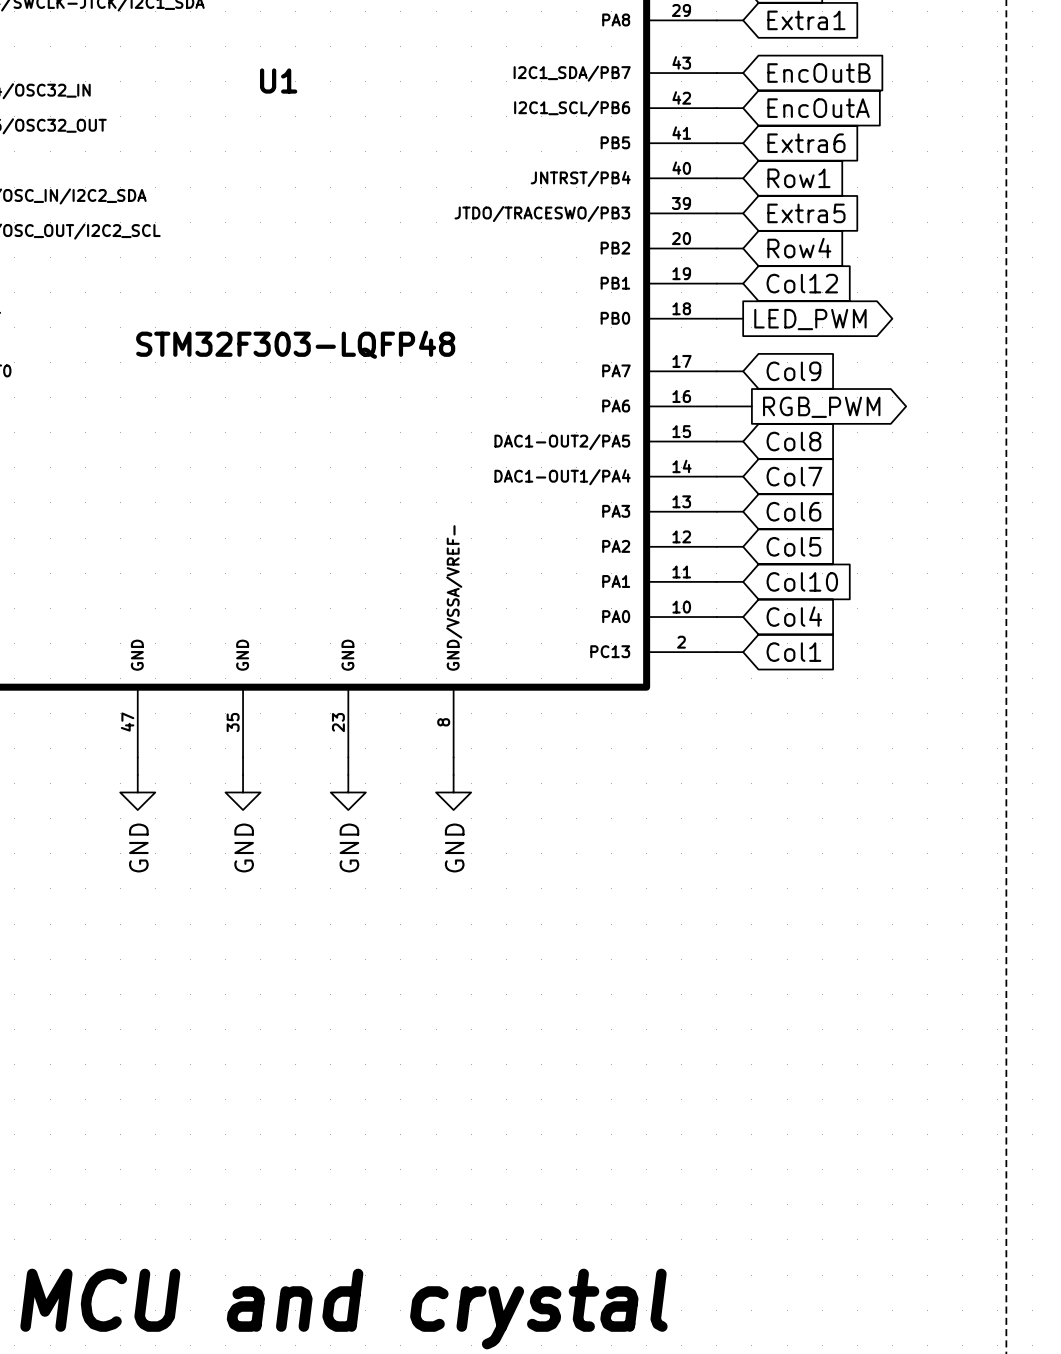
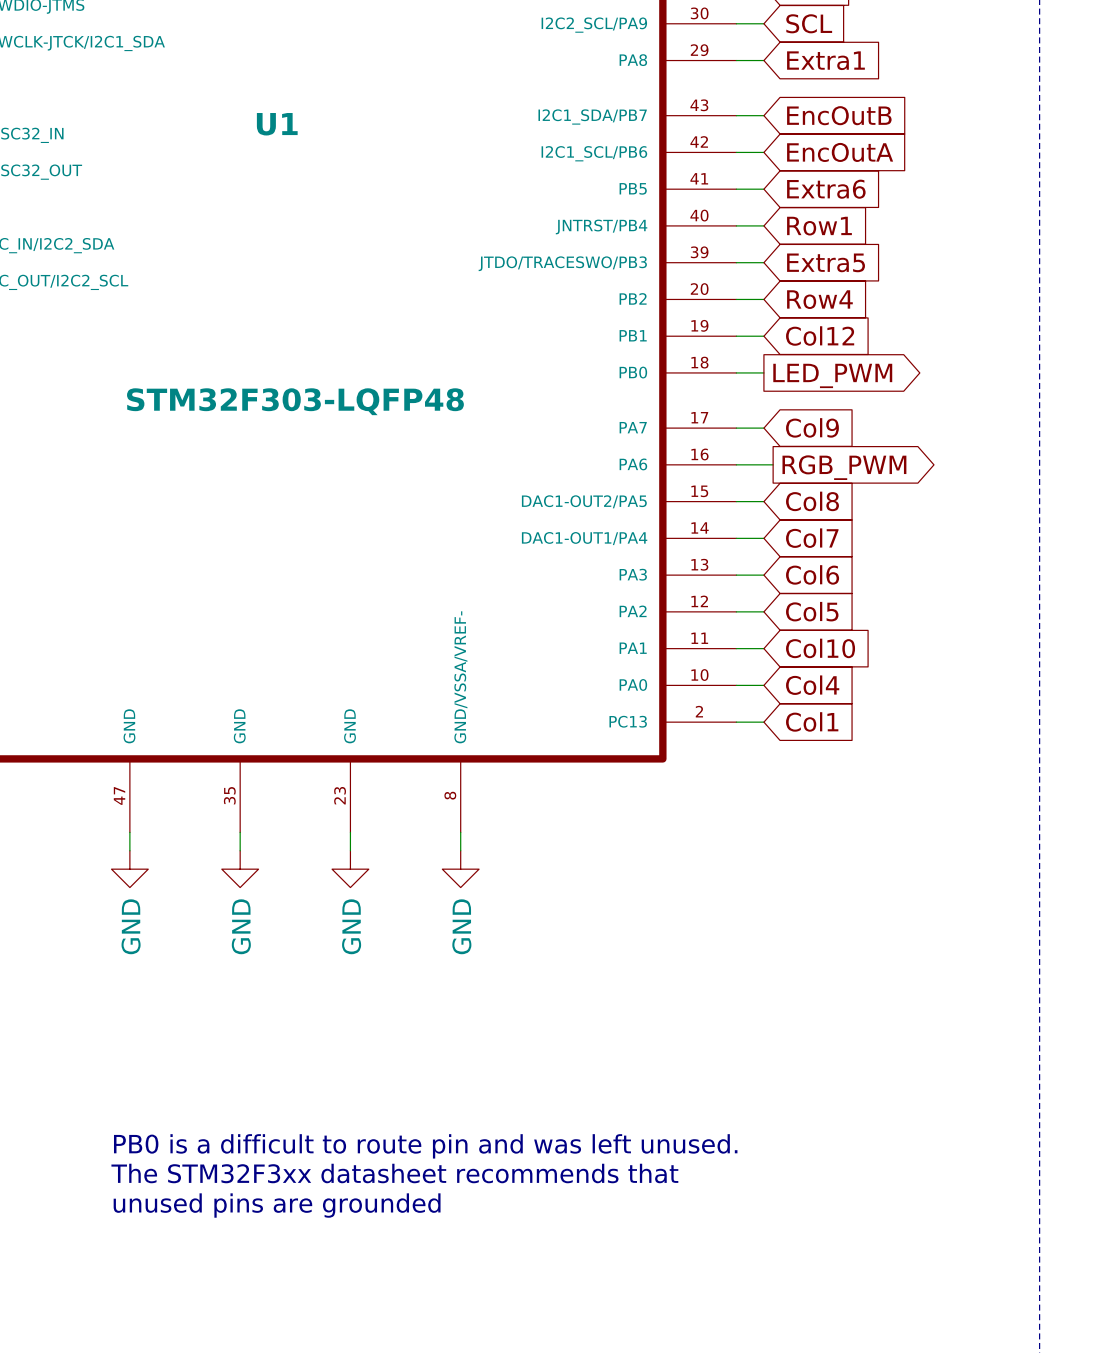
text: none -> PB0 is a difficult to route pin and was left unused. (425, 1146)
text: none -> The STM32F3xx datasheet recommends that (394, 1173)
text: none -> unused pins are grounded (277, 1205)

